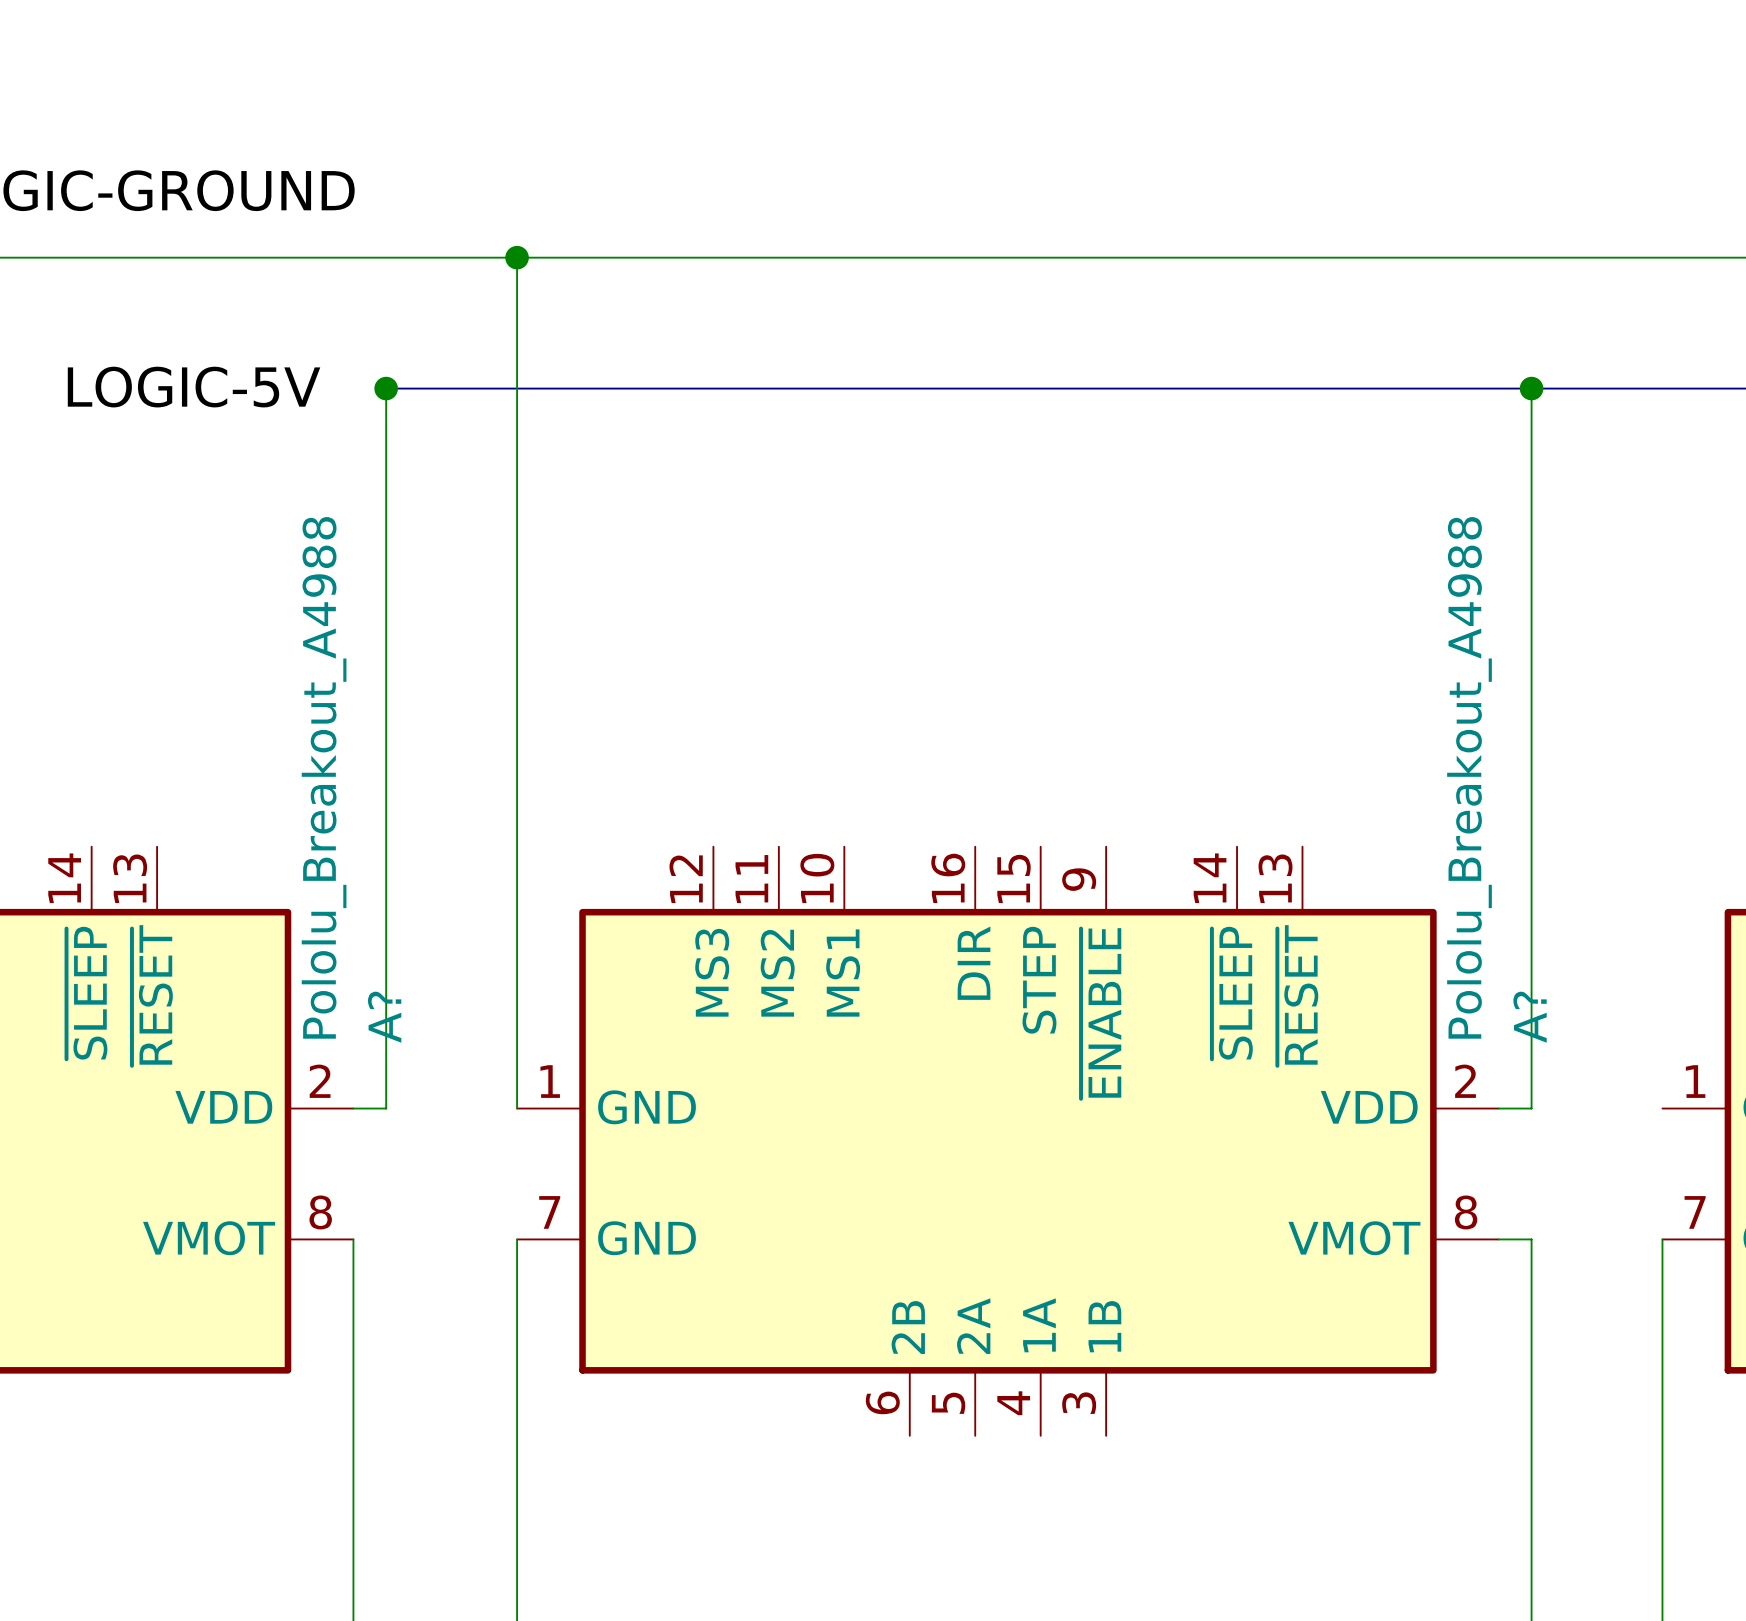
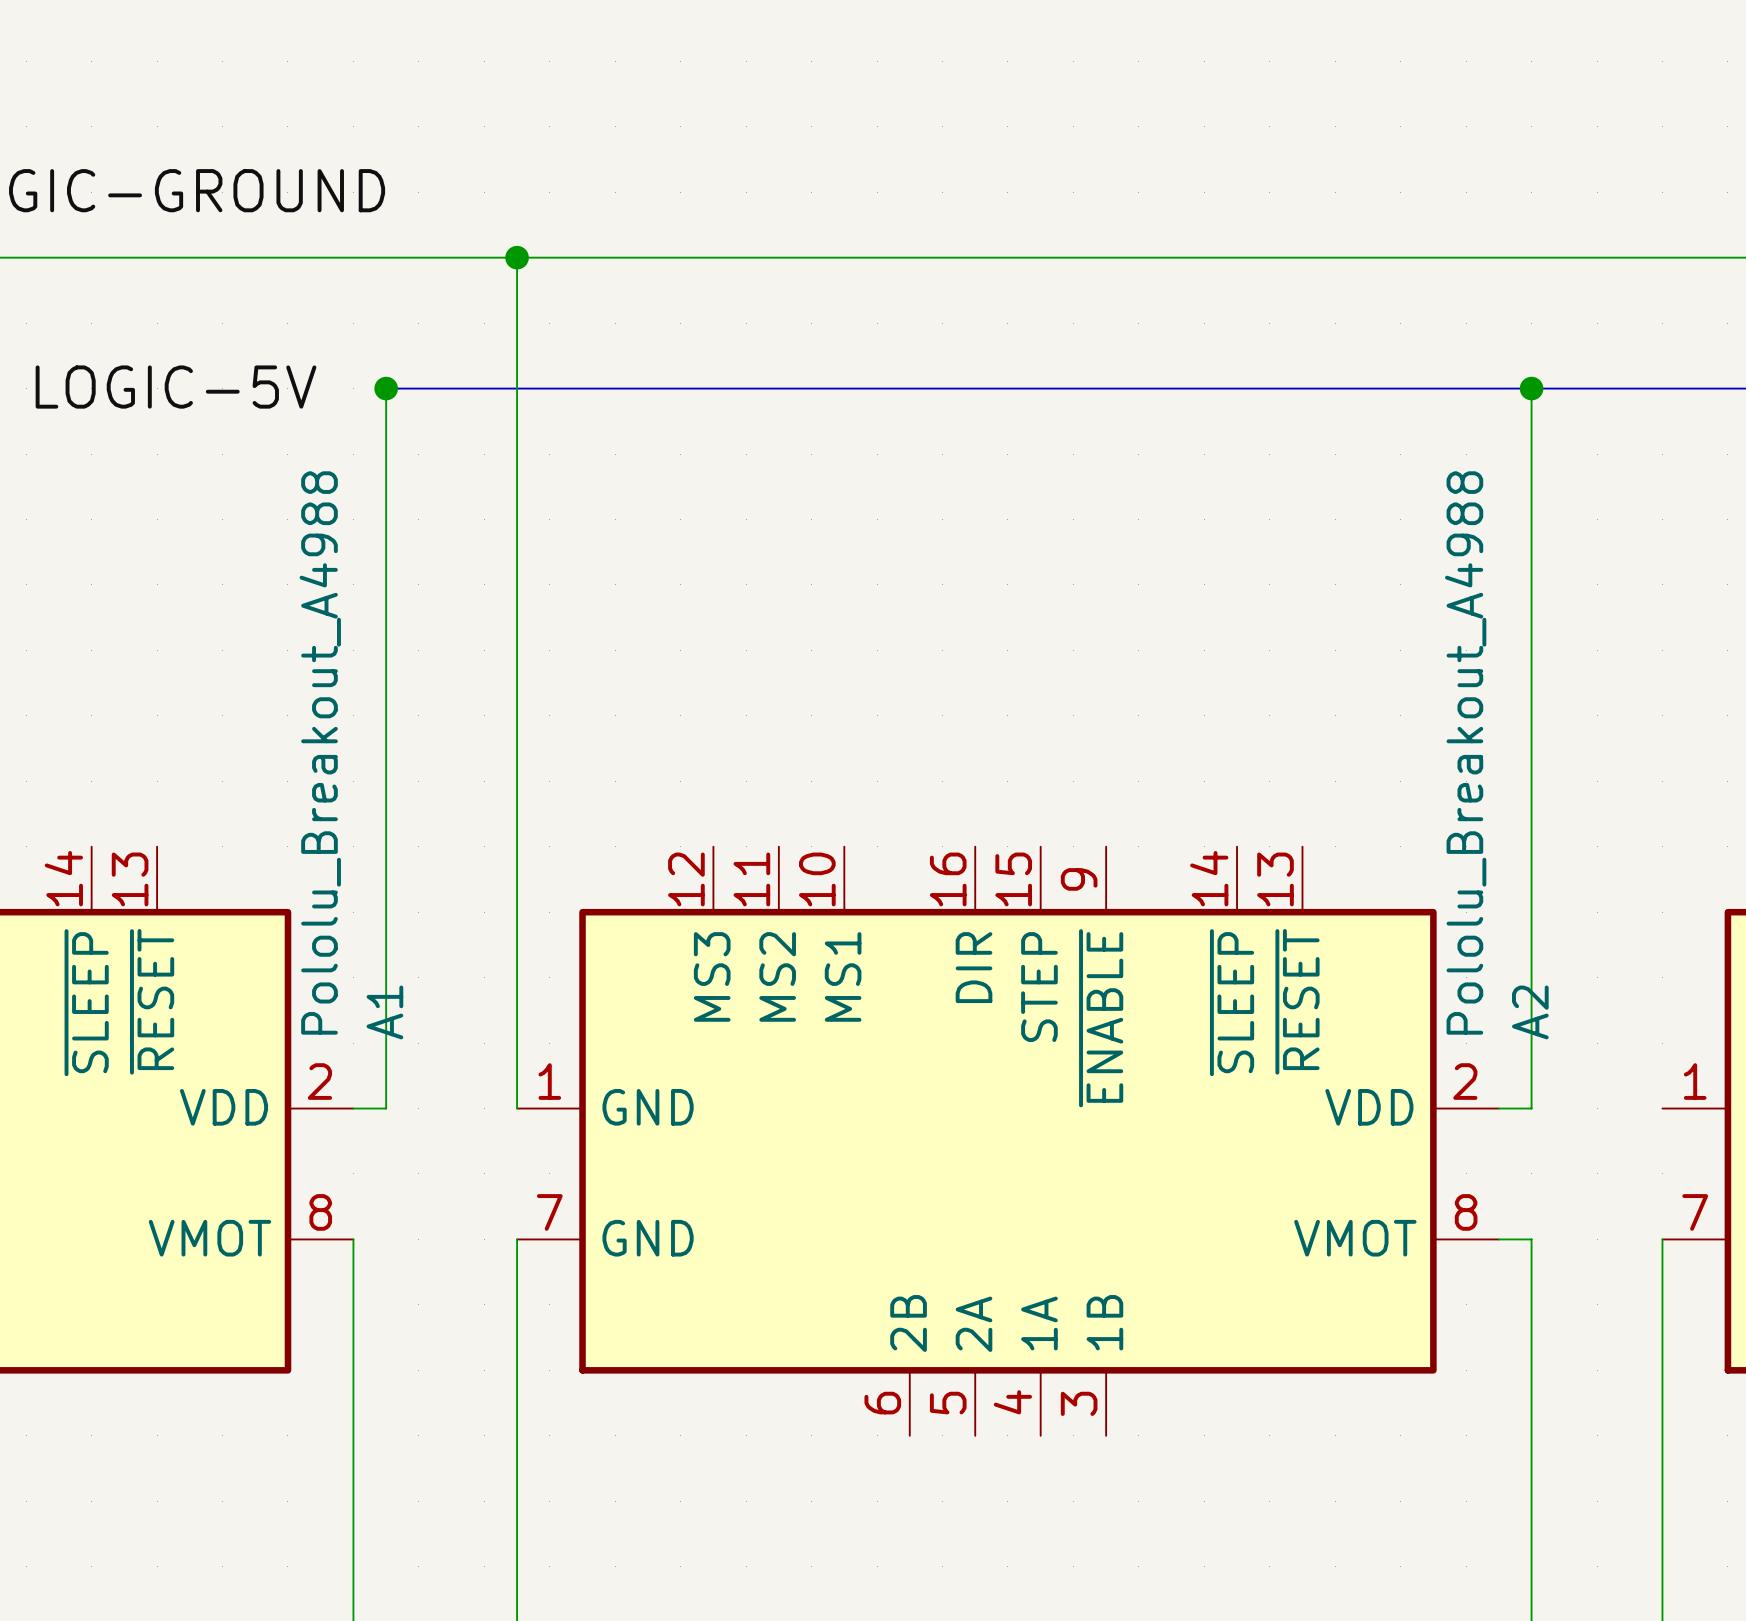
A? name: A? (384, 1017) -> A1 (384, 1012)
A? name: A? (1530, 1017) -> A2 (1530, 1012)

